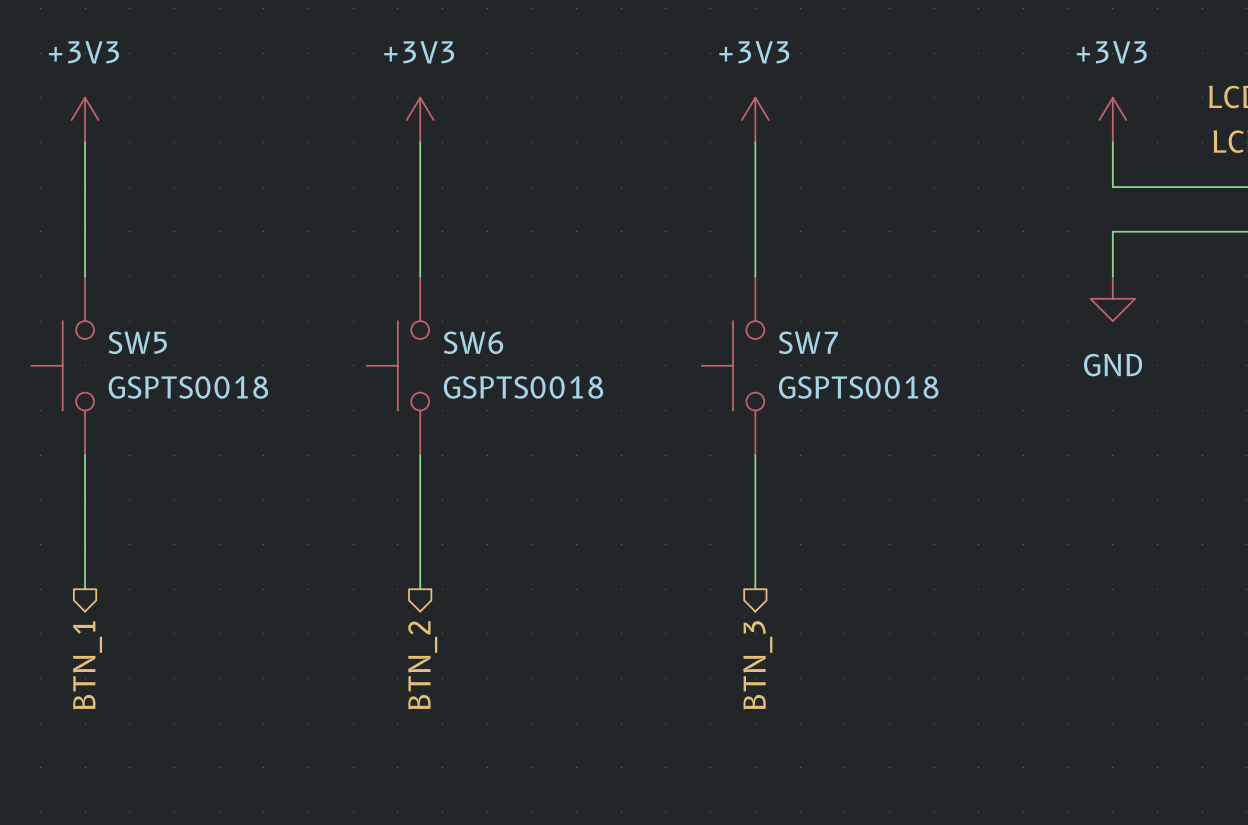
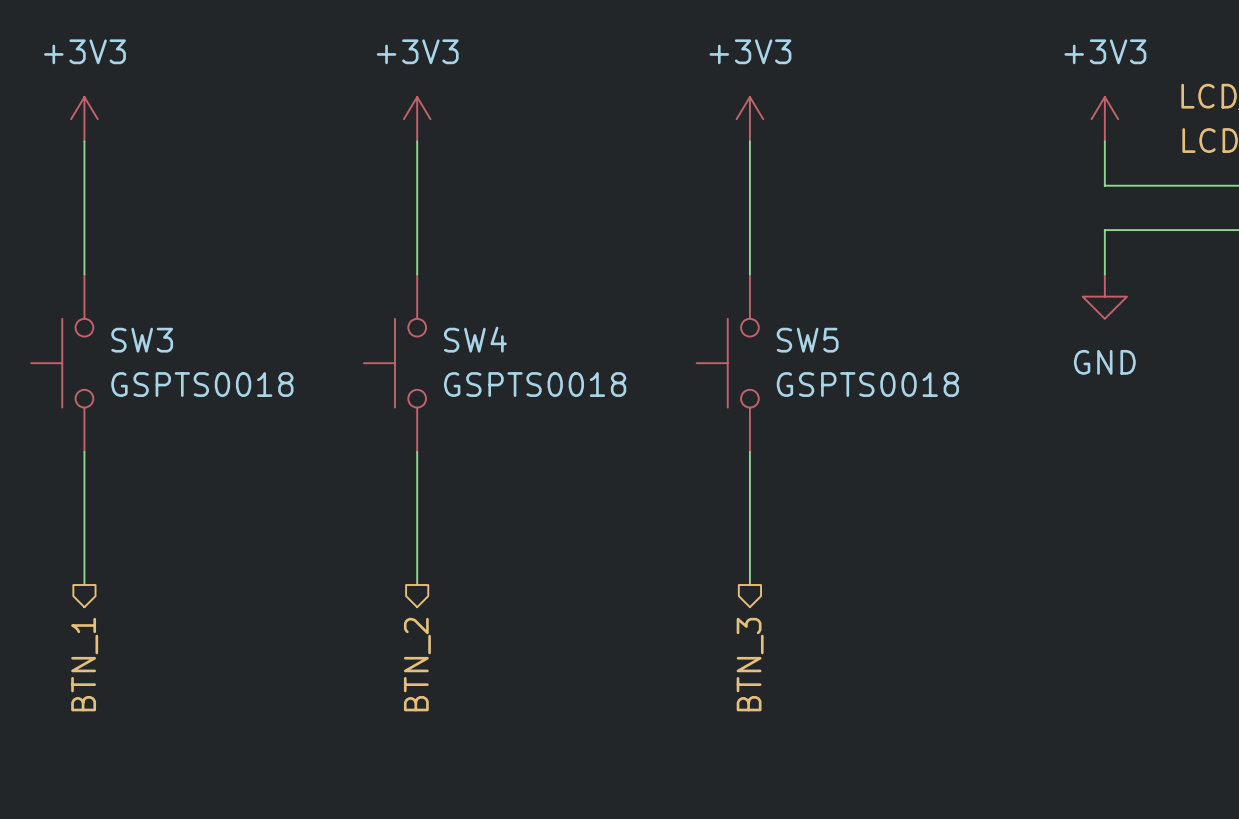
SW5 name: SW5 (137, 342) -> SW3 (142, 340)
SW6 name: SW6 (473, 342) -> SW4 (475, 339)
SW7 name: SW7 (808, 342) -> SW5 (807, 340)

